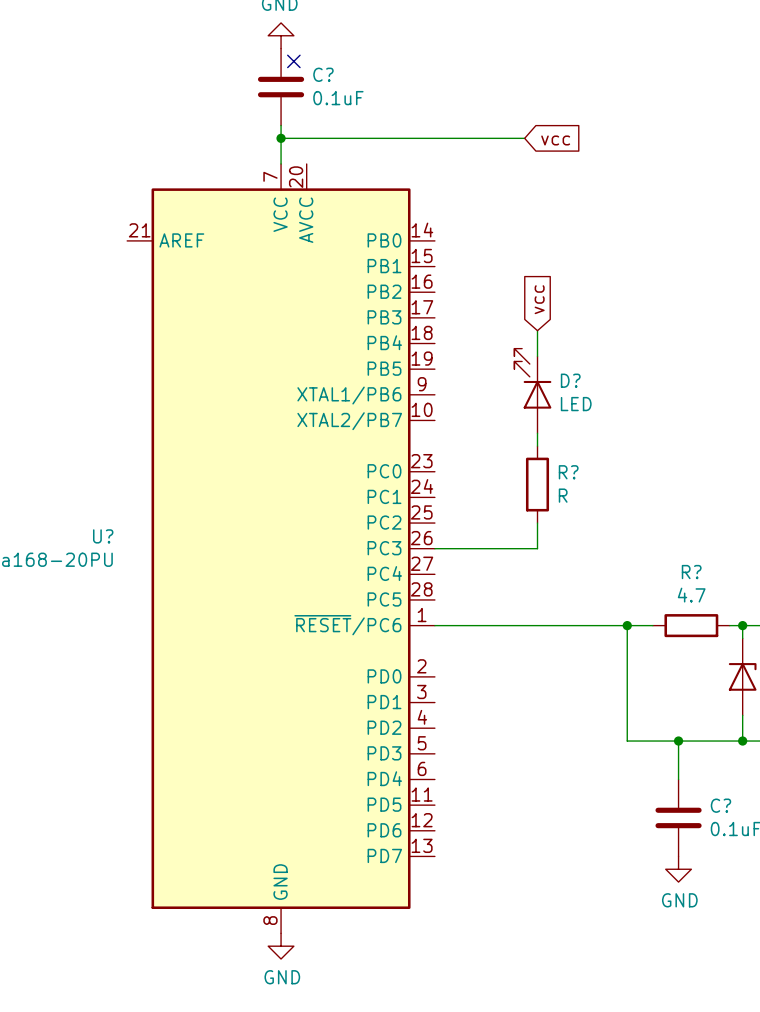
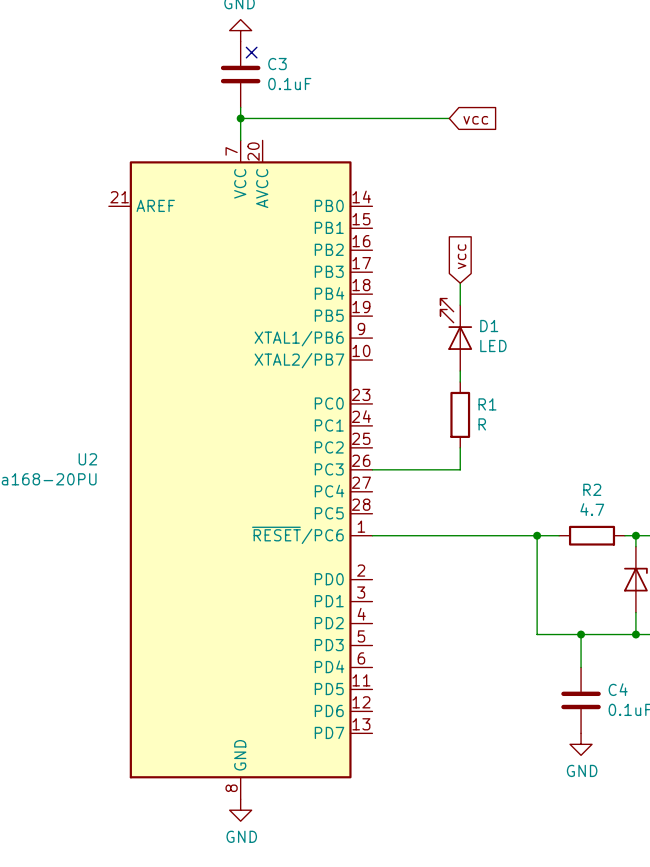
C? name: C? (323, 74) -> C3 (277, 64)
D? name: D? (570, 380) -> D1 (489, 326)
R? name: R? (568, 472) -> R1 (487, 404)
U? name: U? (103, 536) -> U2 (87, 459)
R? name: R? (691, 572) -> R2 (592, 489)
C? name: C? (720, 805) -> C4 (618, 689)

